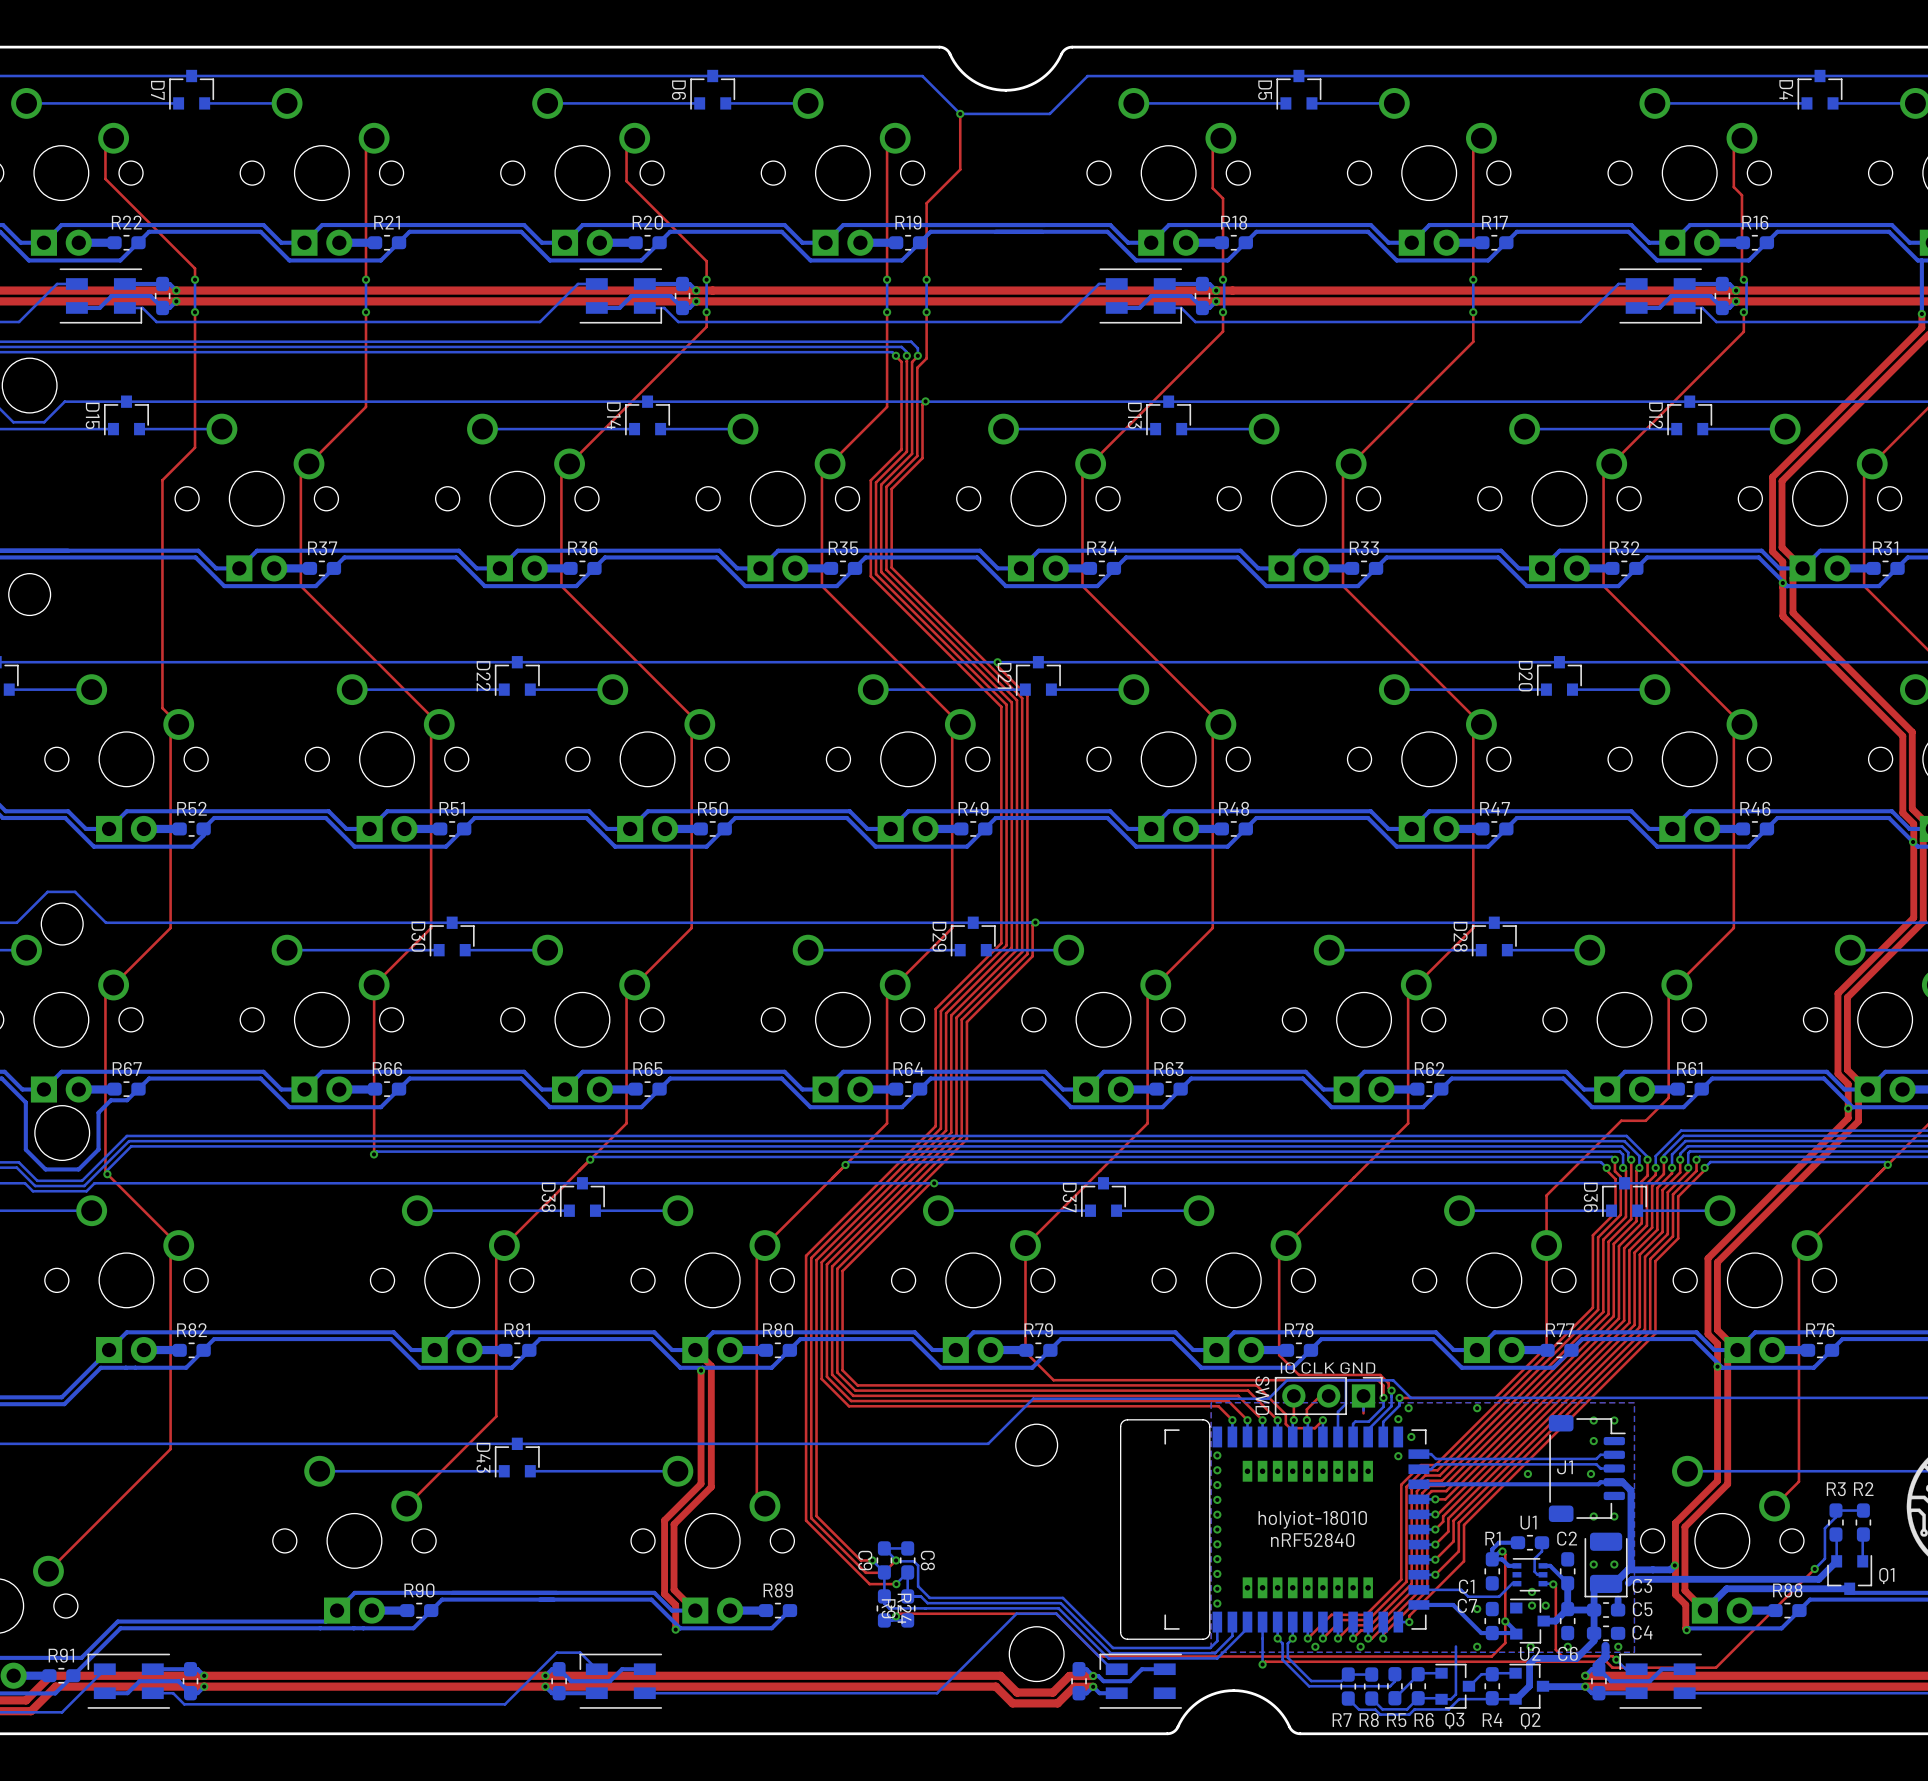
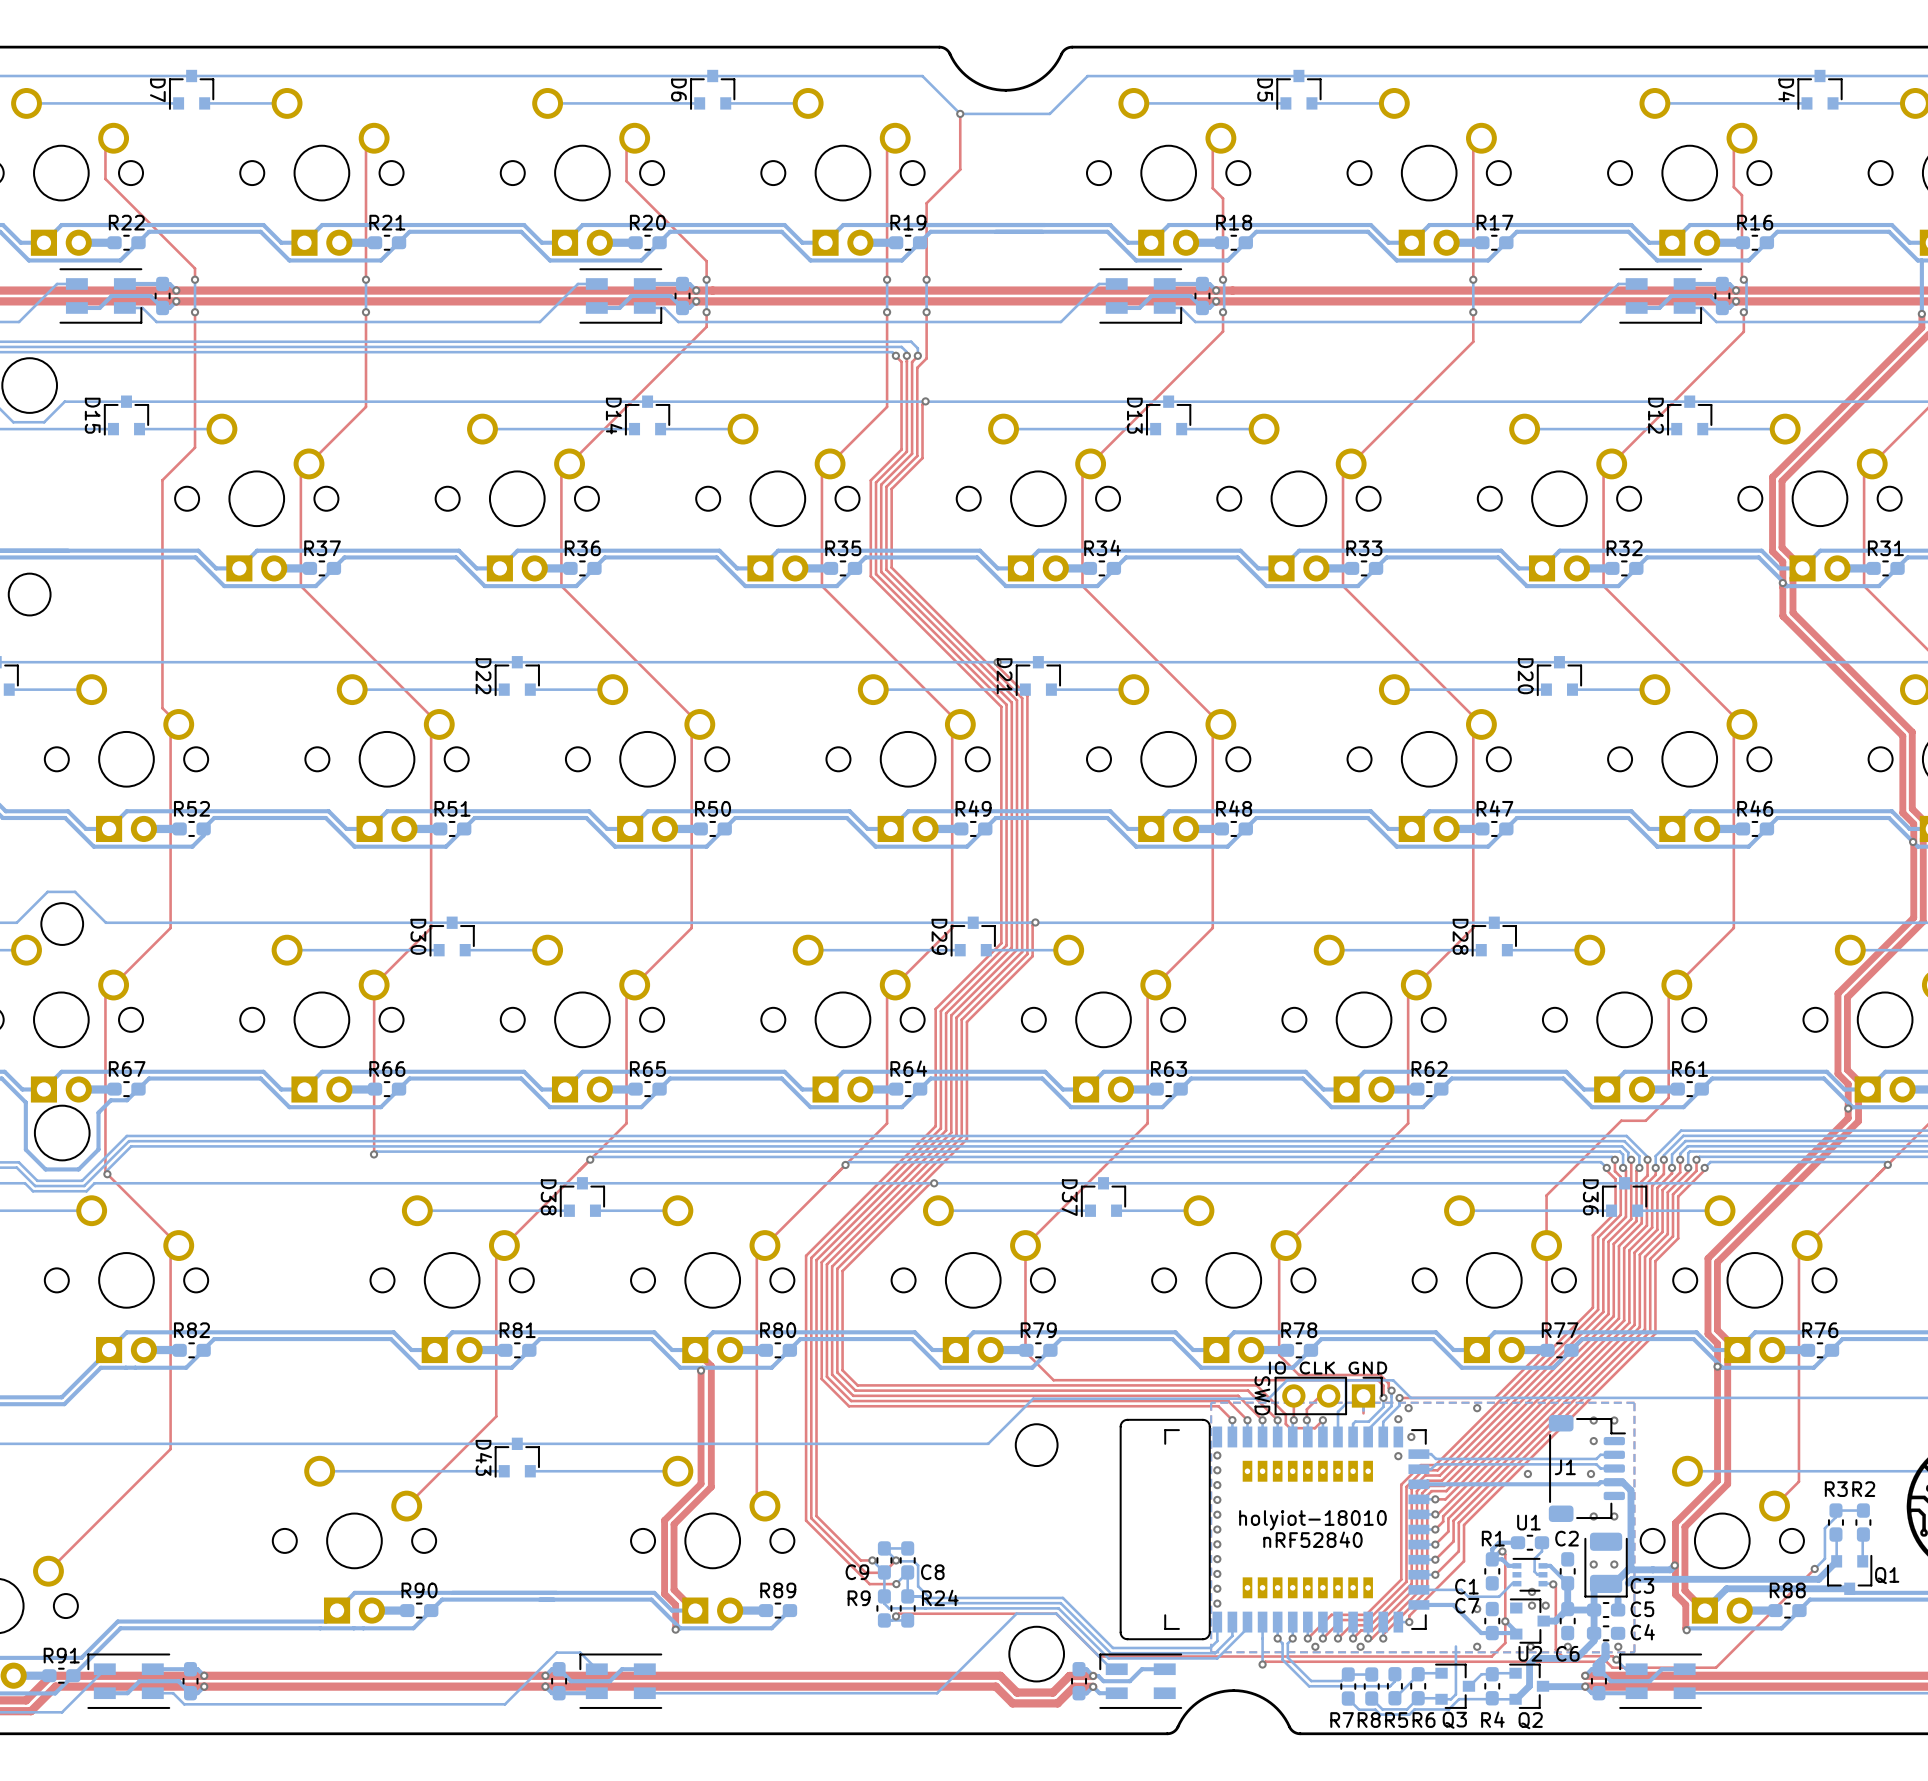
C9 name rotation: 0° (865, 1560) -> 90° counterclockwise (857, 1572)
C8 name rotation: 0° (927, 1560) -> 90° counterclockwise (932, 1572)
R9 name rotation: 0° (888, 1608) -> 90° counterclockwise (859, 1598)
R24 name rotation: 0° (904, 1608) -> 90° counterclockwise (940, 1597)

